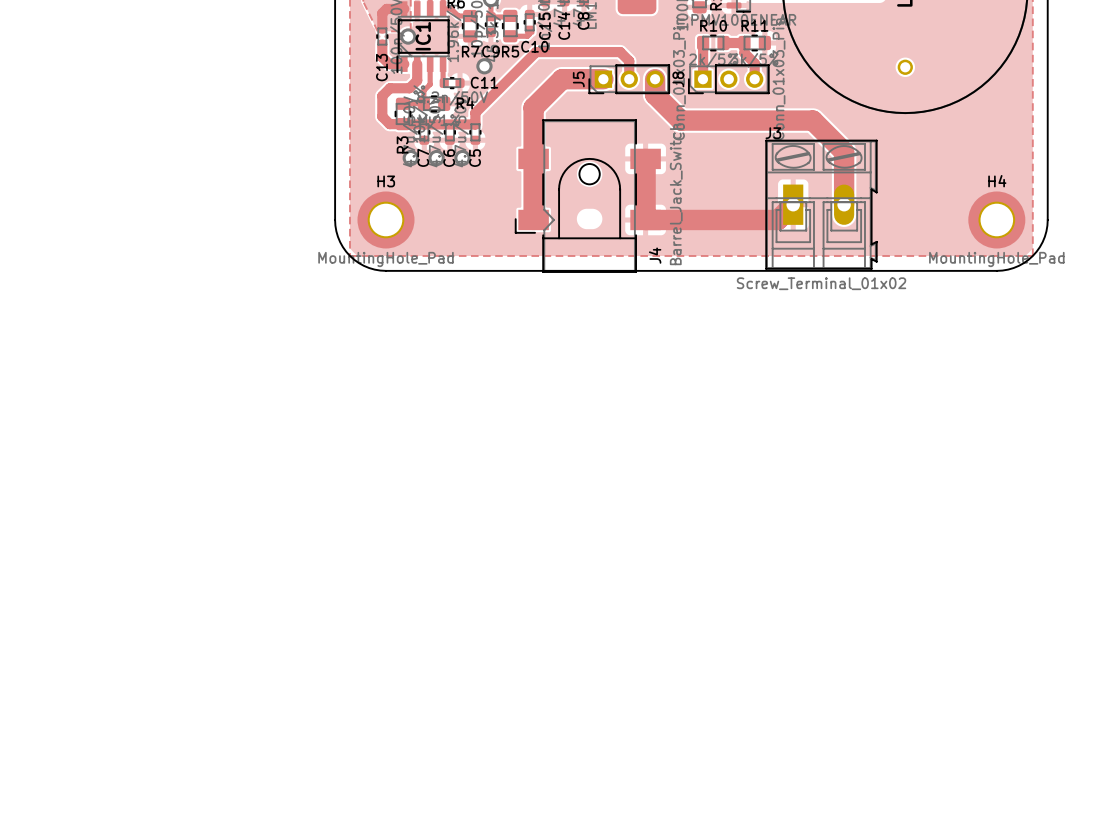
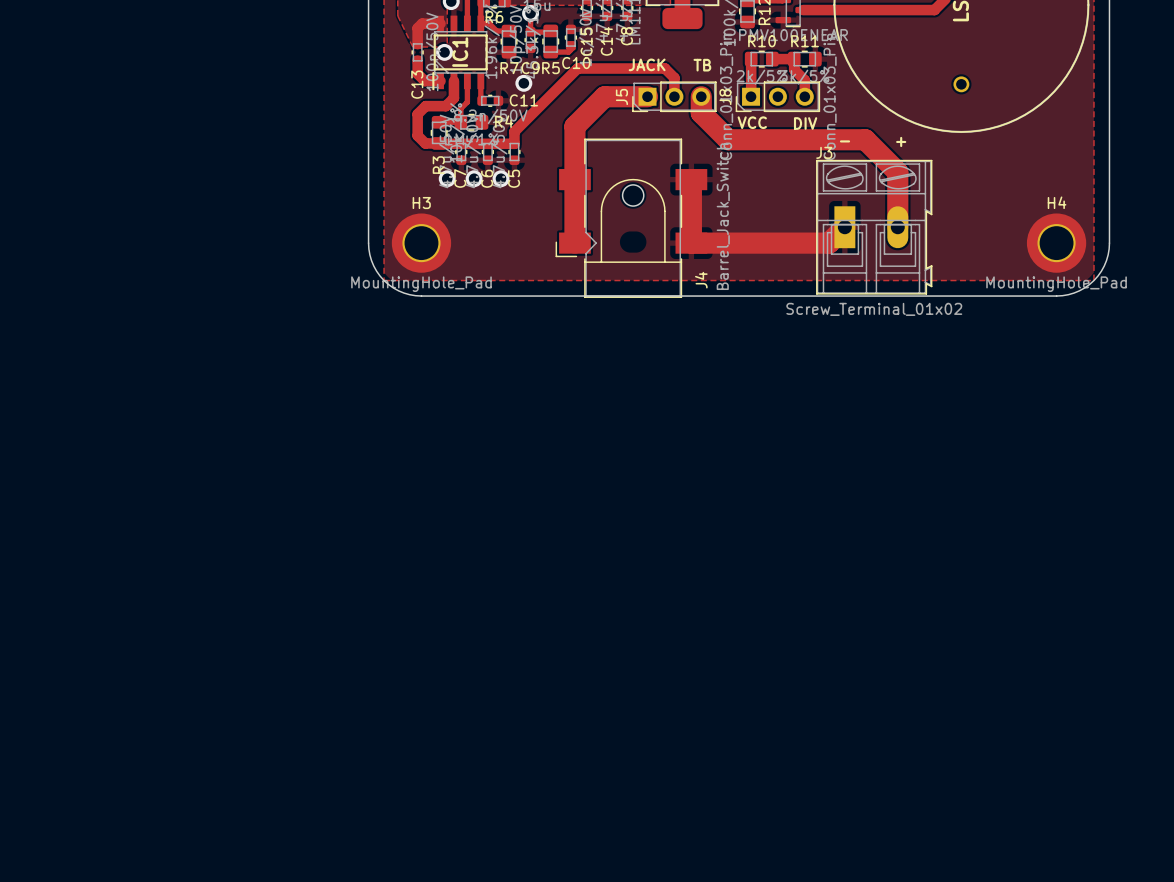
text: none -> JACK (647, 64)
text: none -> TB (702, 65)
text: none -> VCC (752, 122)
text: none -> DIV (805, 123)
text: none -> - (845, 141)
text: none -> + (901, 141)

